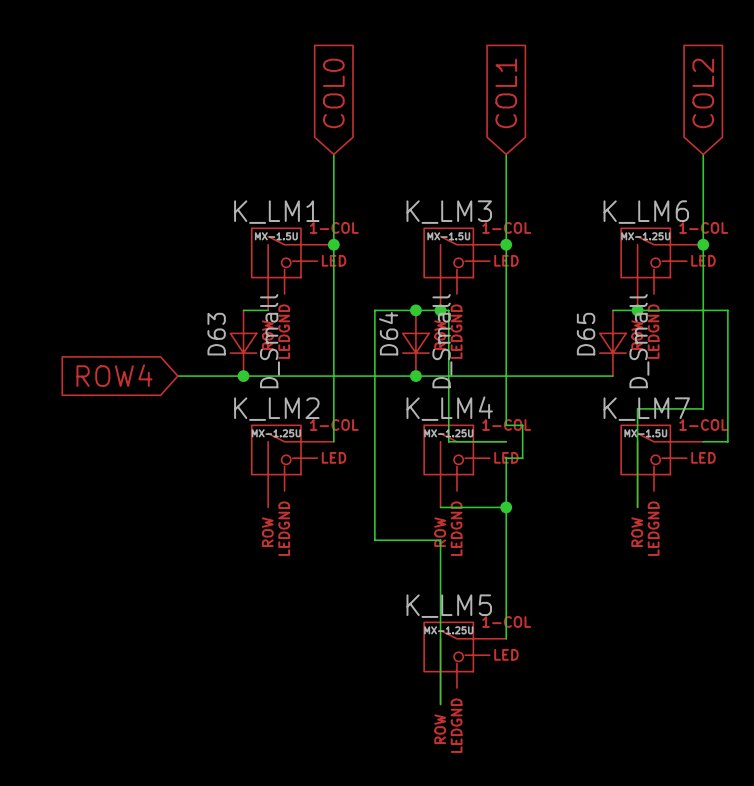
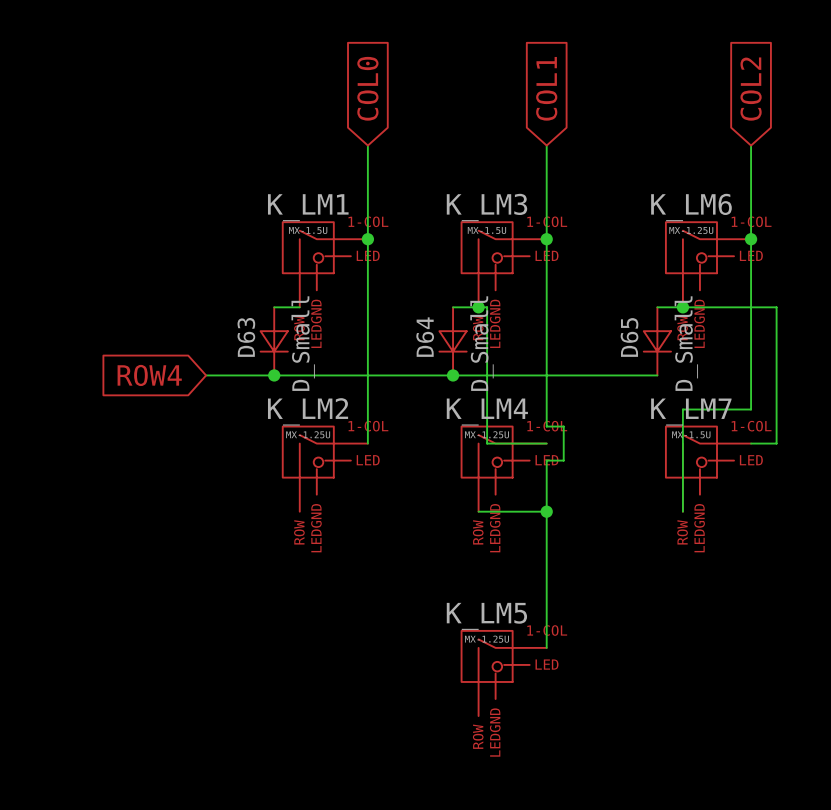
wire: (415, 310) (374, 310) (374, 540) (440, 540) (440, 704) -> none
junction: (415, 310) -> none

